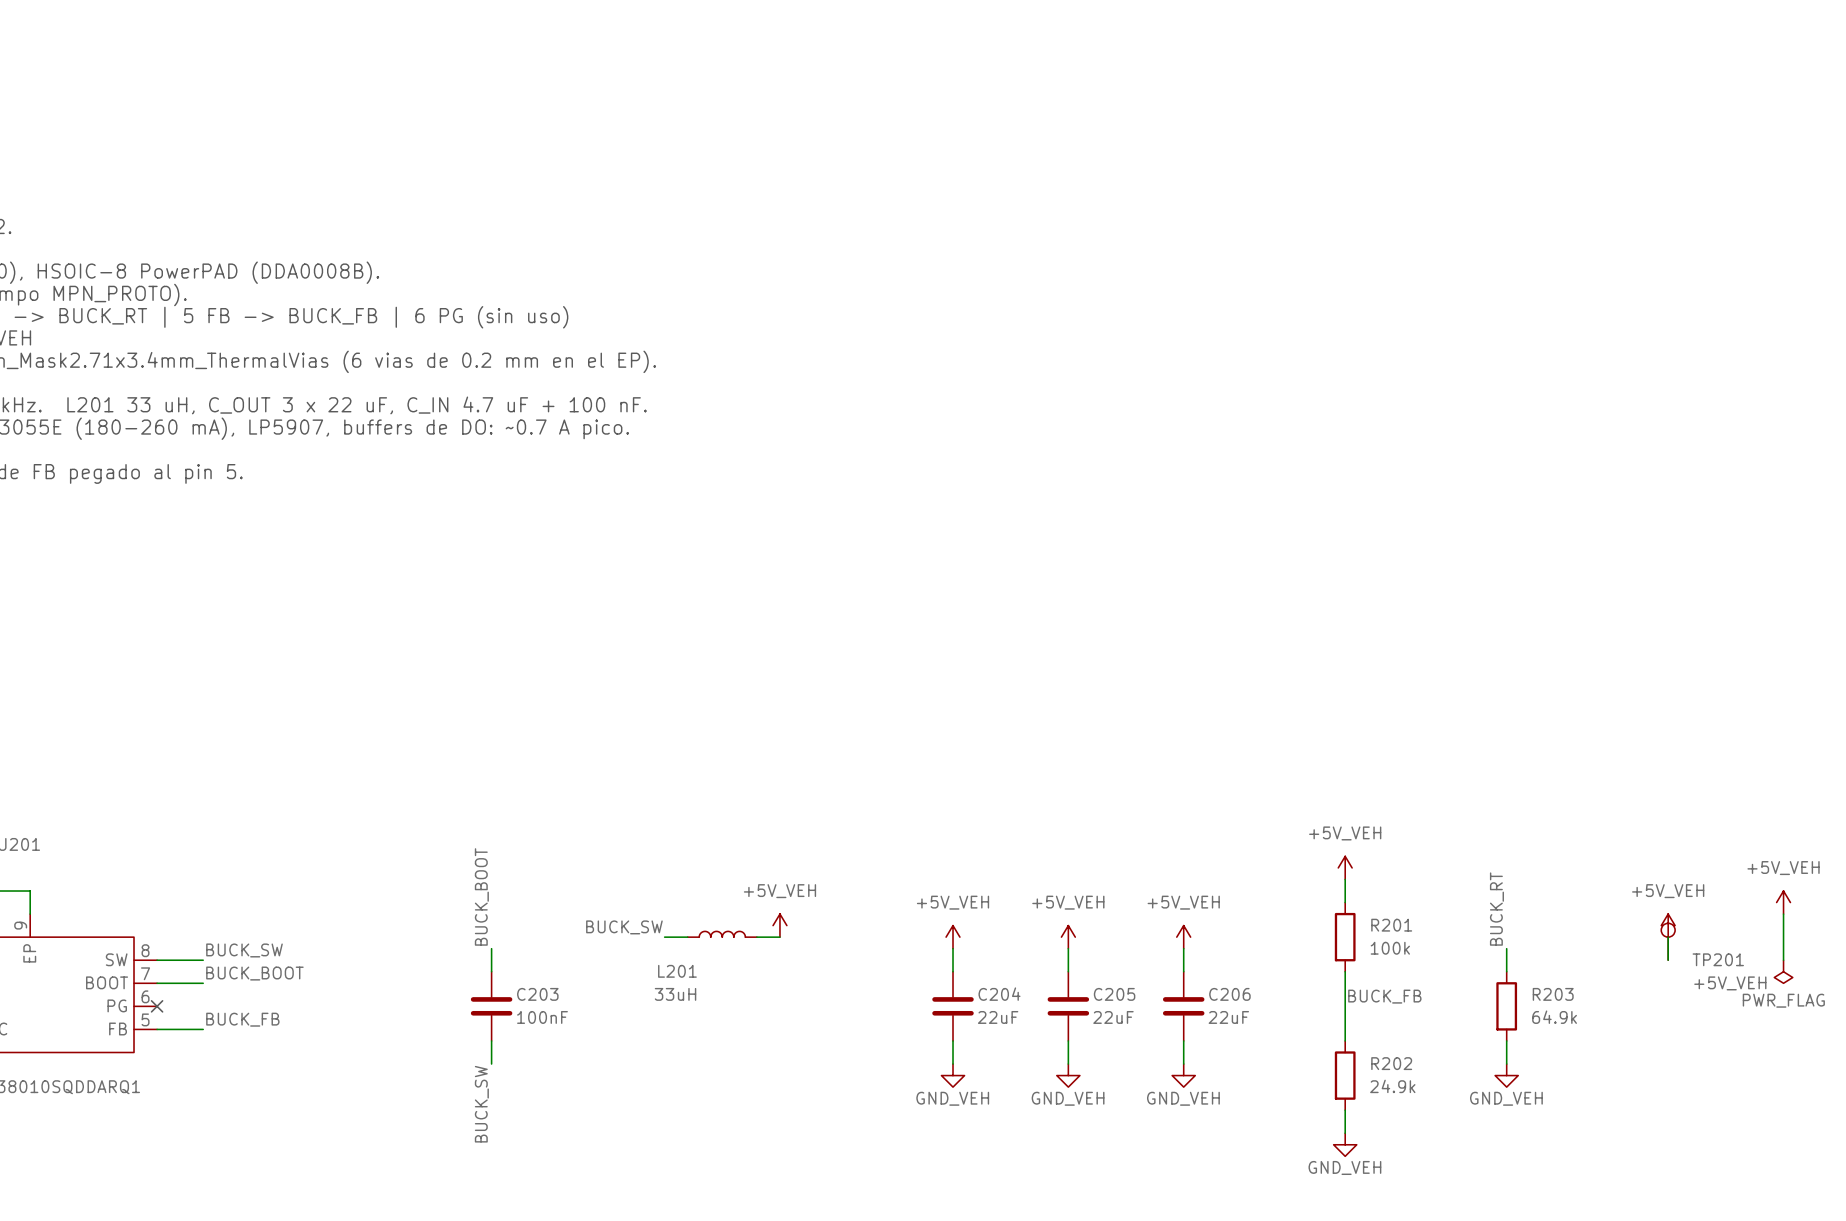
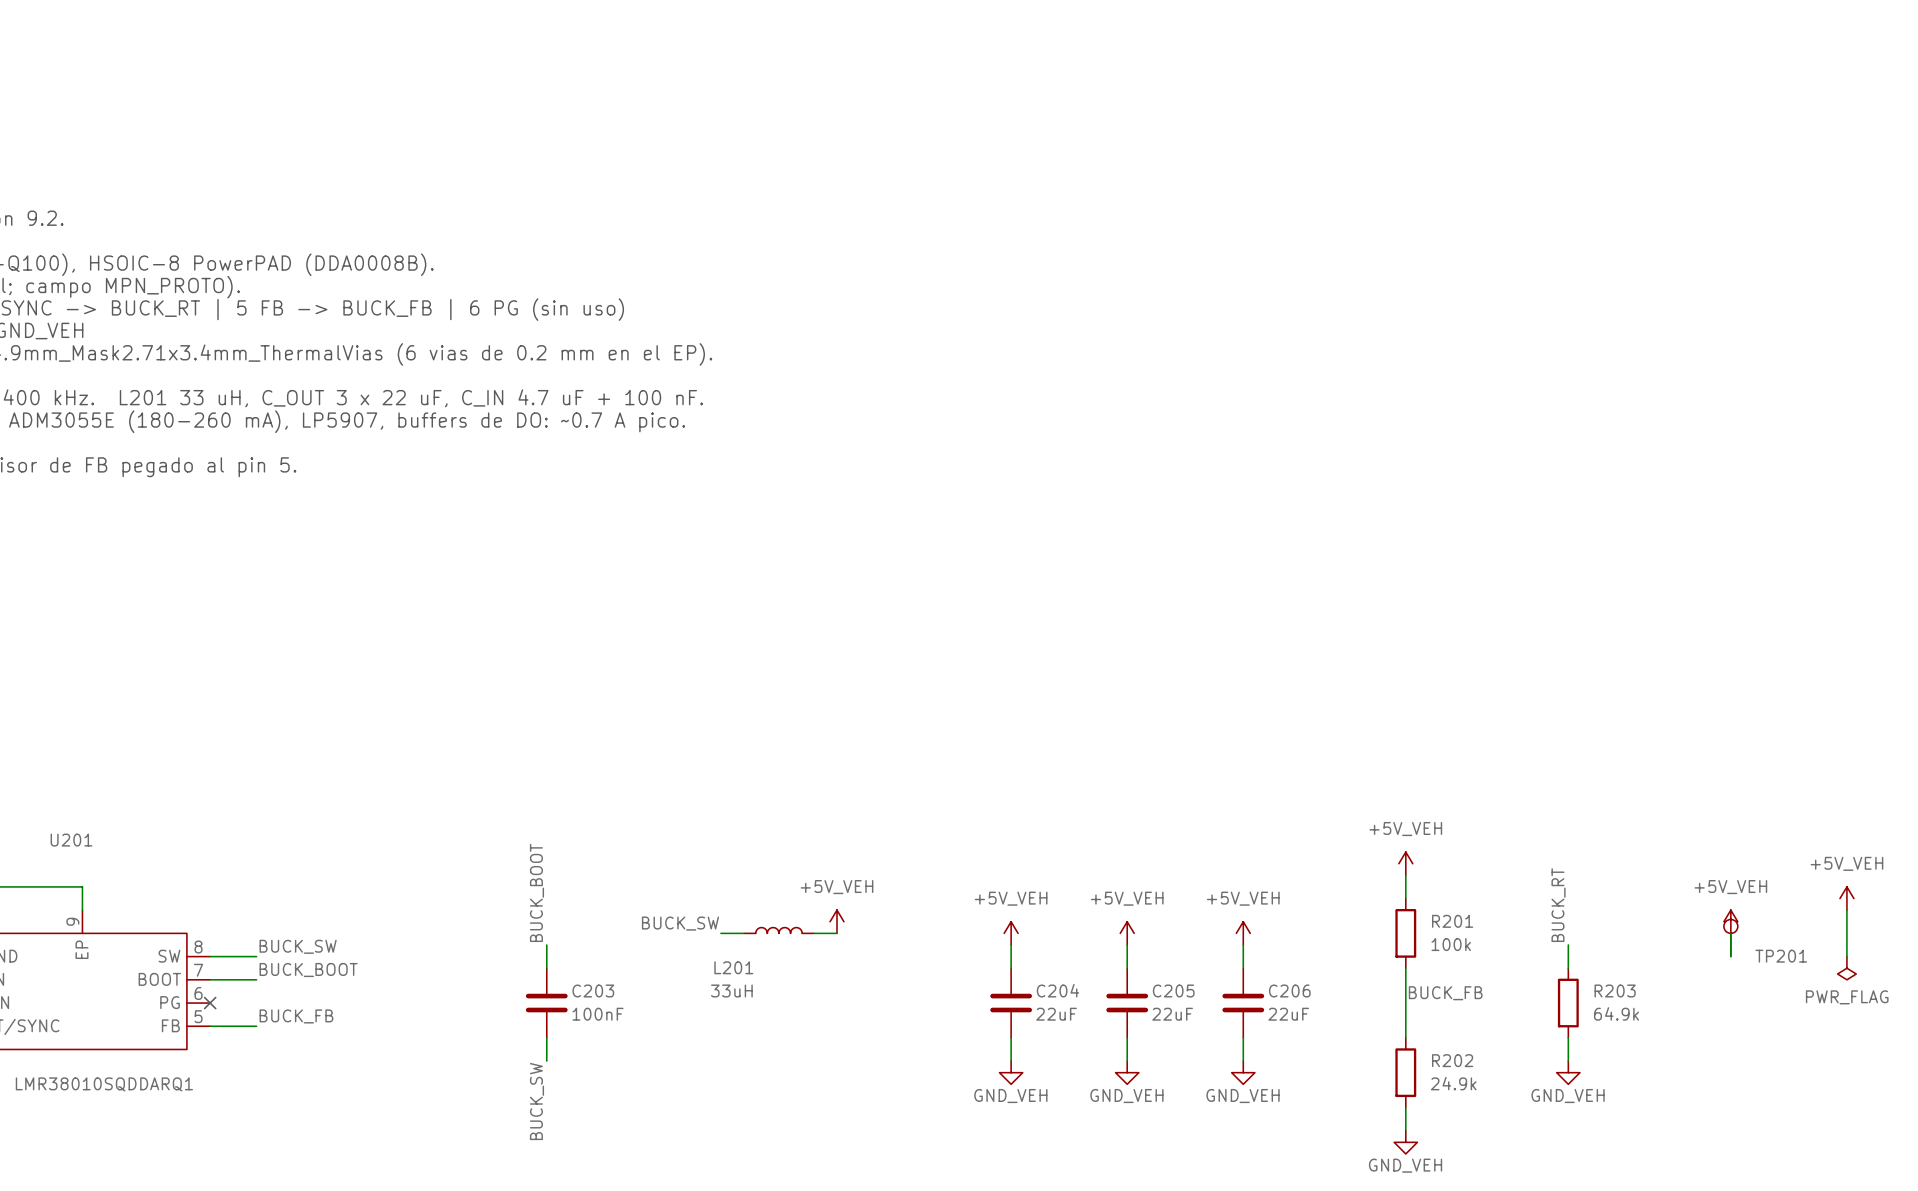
TP201 value: +5V_VEH (1730, 983) -> none

